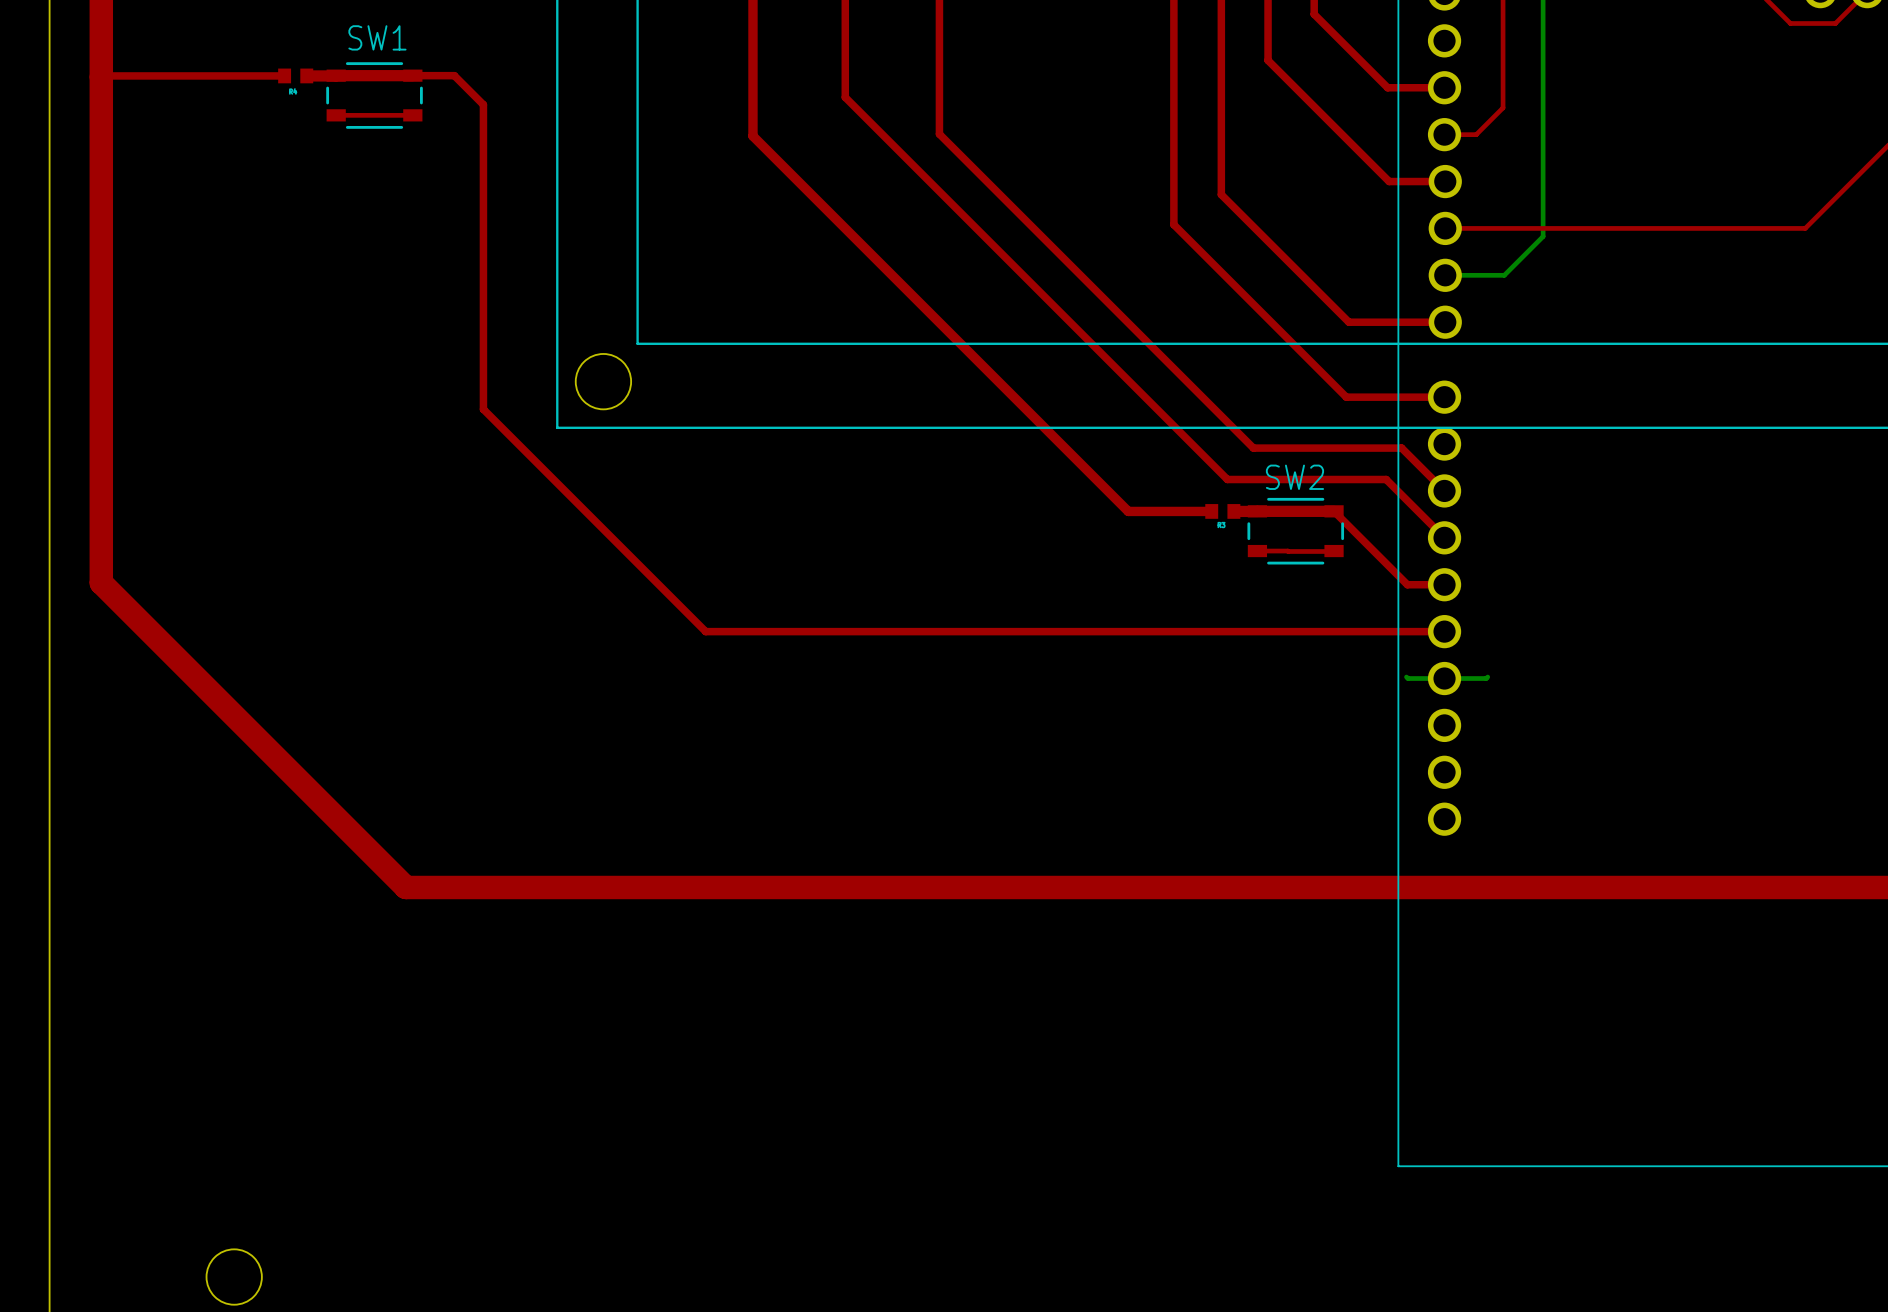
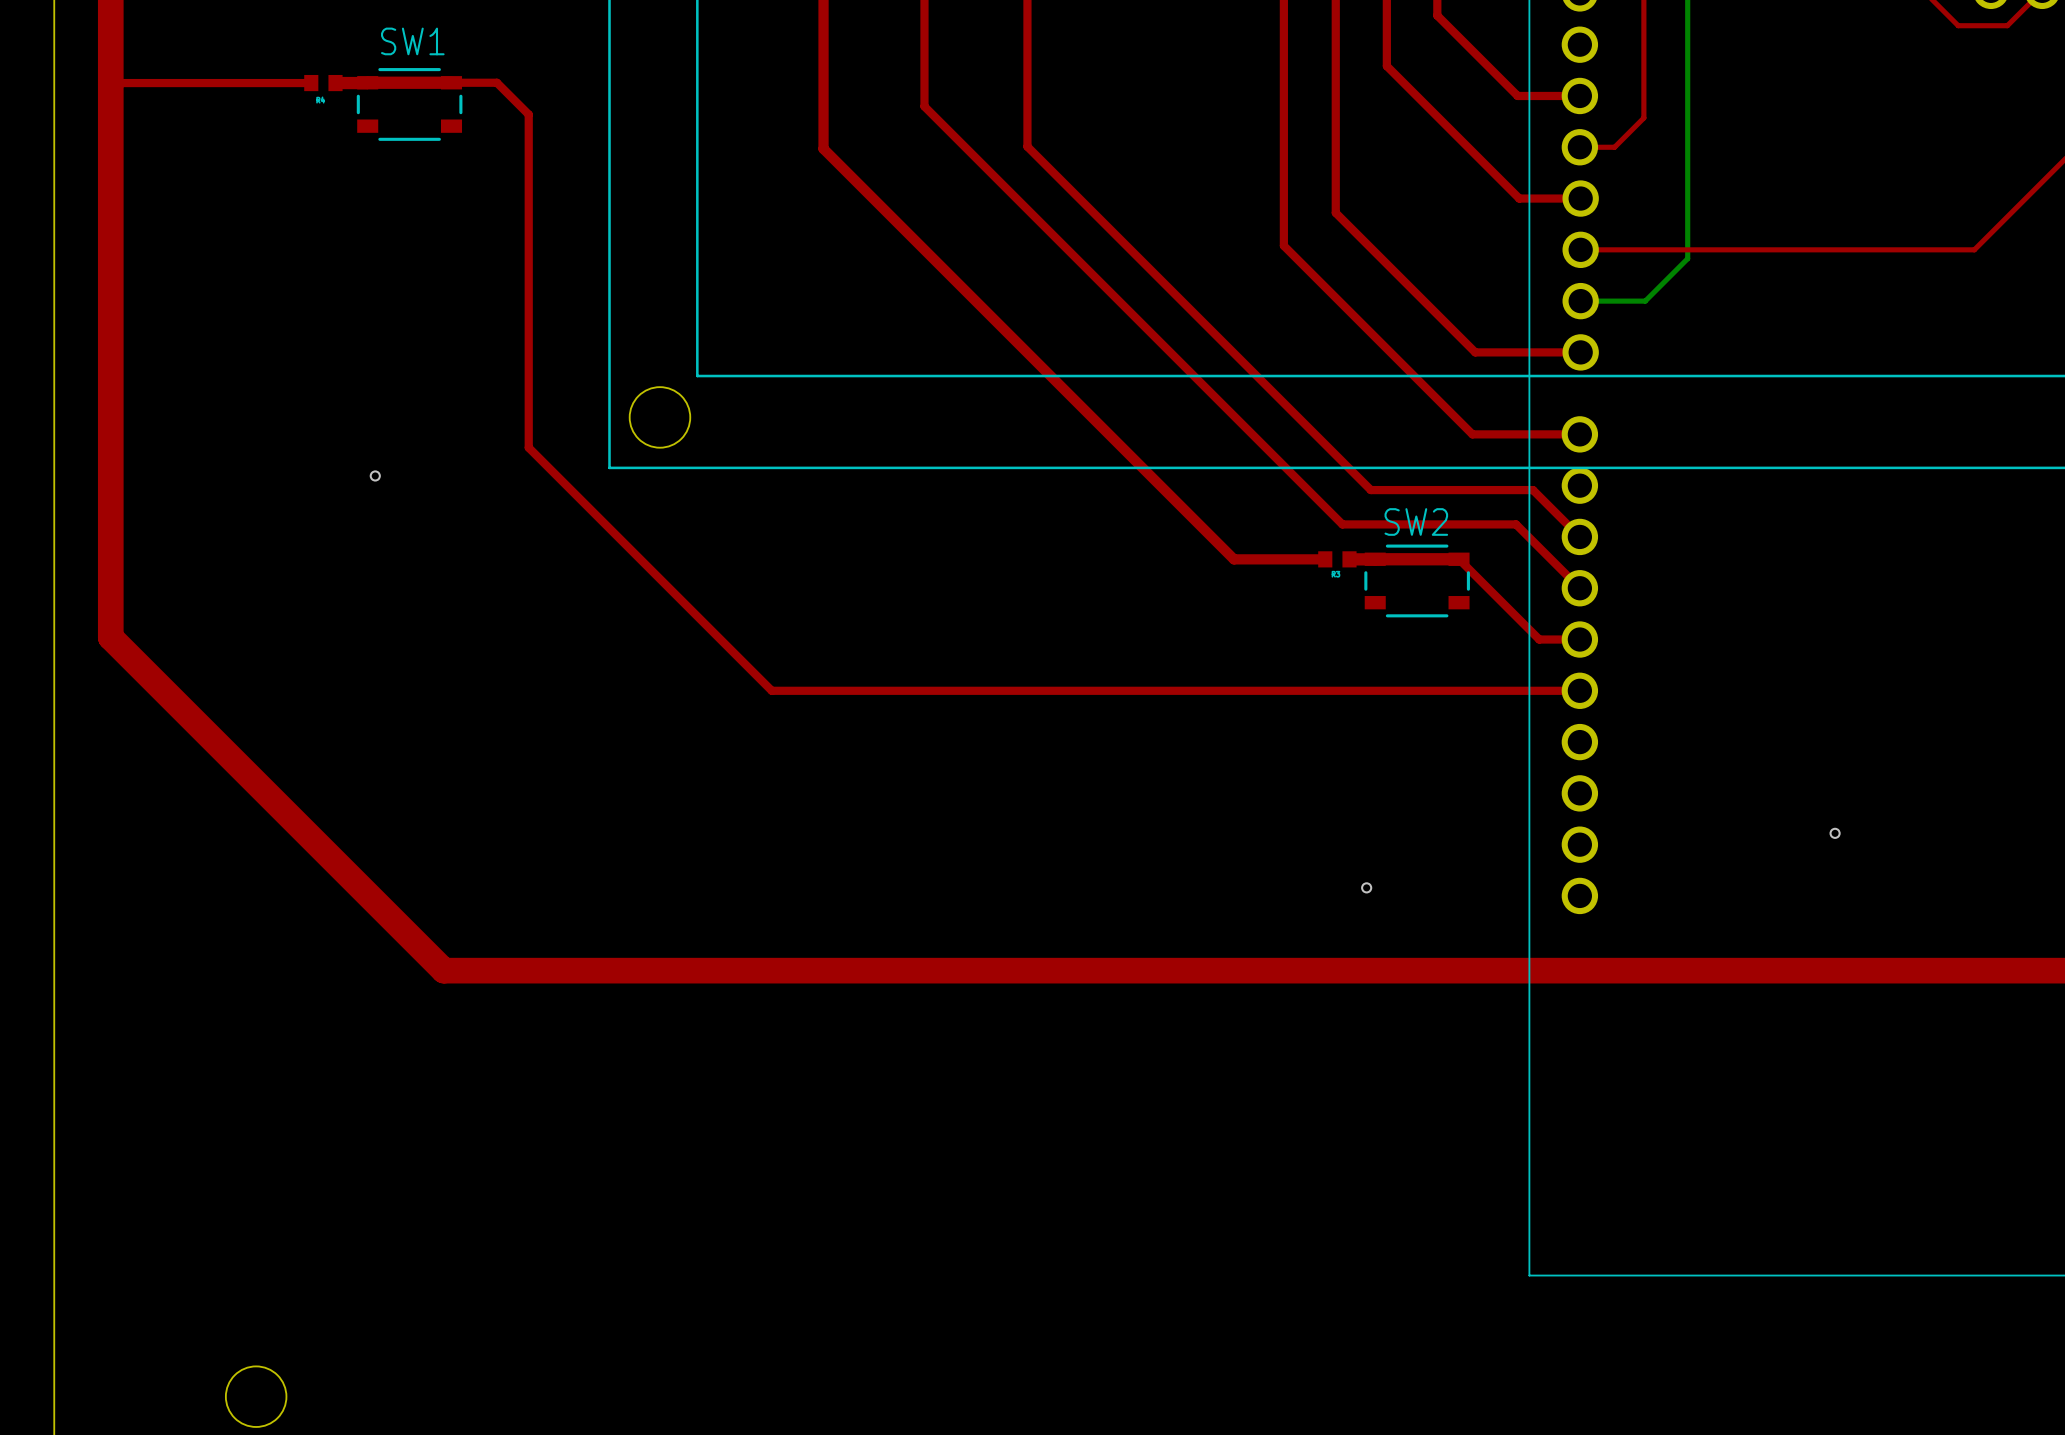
top track: (336, 115) (412, 115) -> none
via: none -> (375, 475)
top track: (1257, 551) (1334, 551) -> none
bottom track: (1406, 677) (1487, 677) -> none
via: none -> (1835, 833)
via: none -> (1366, 887)

